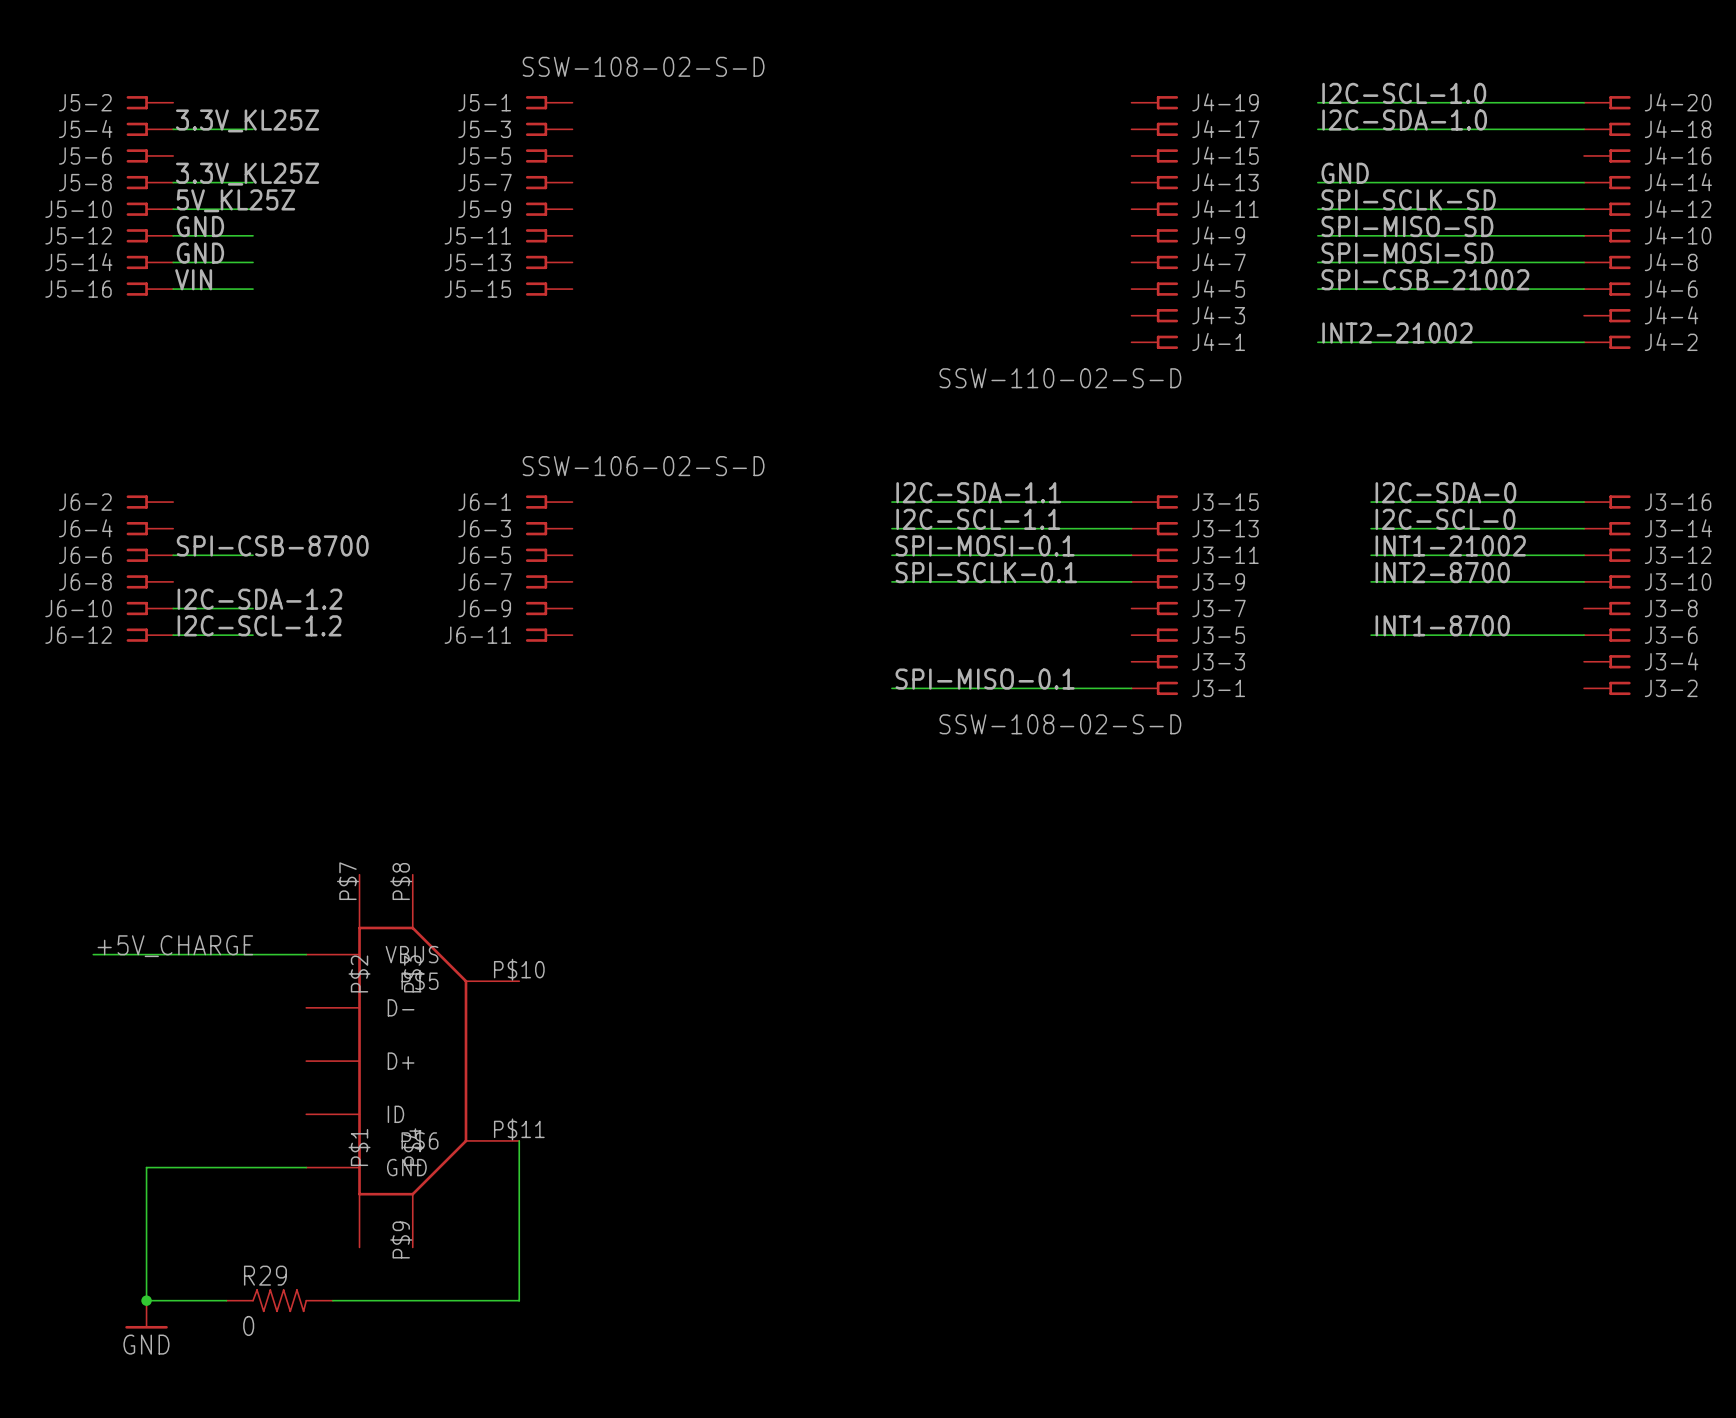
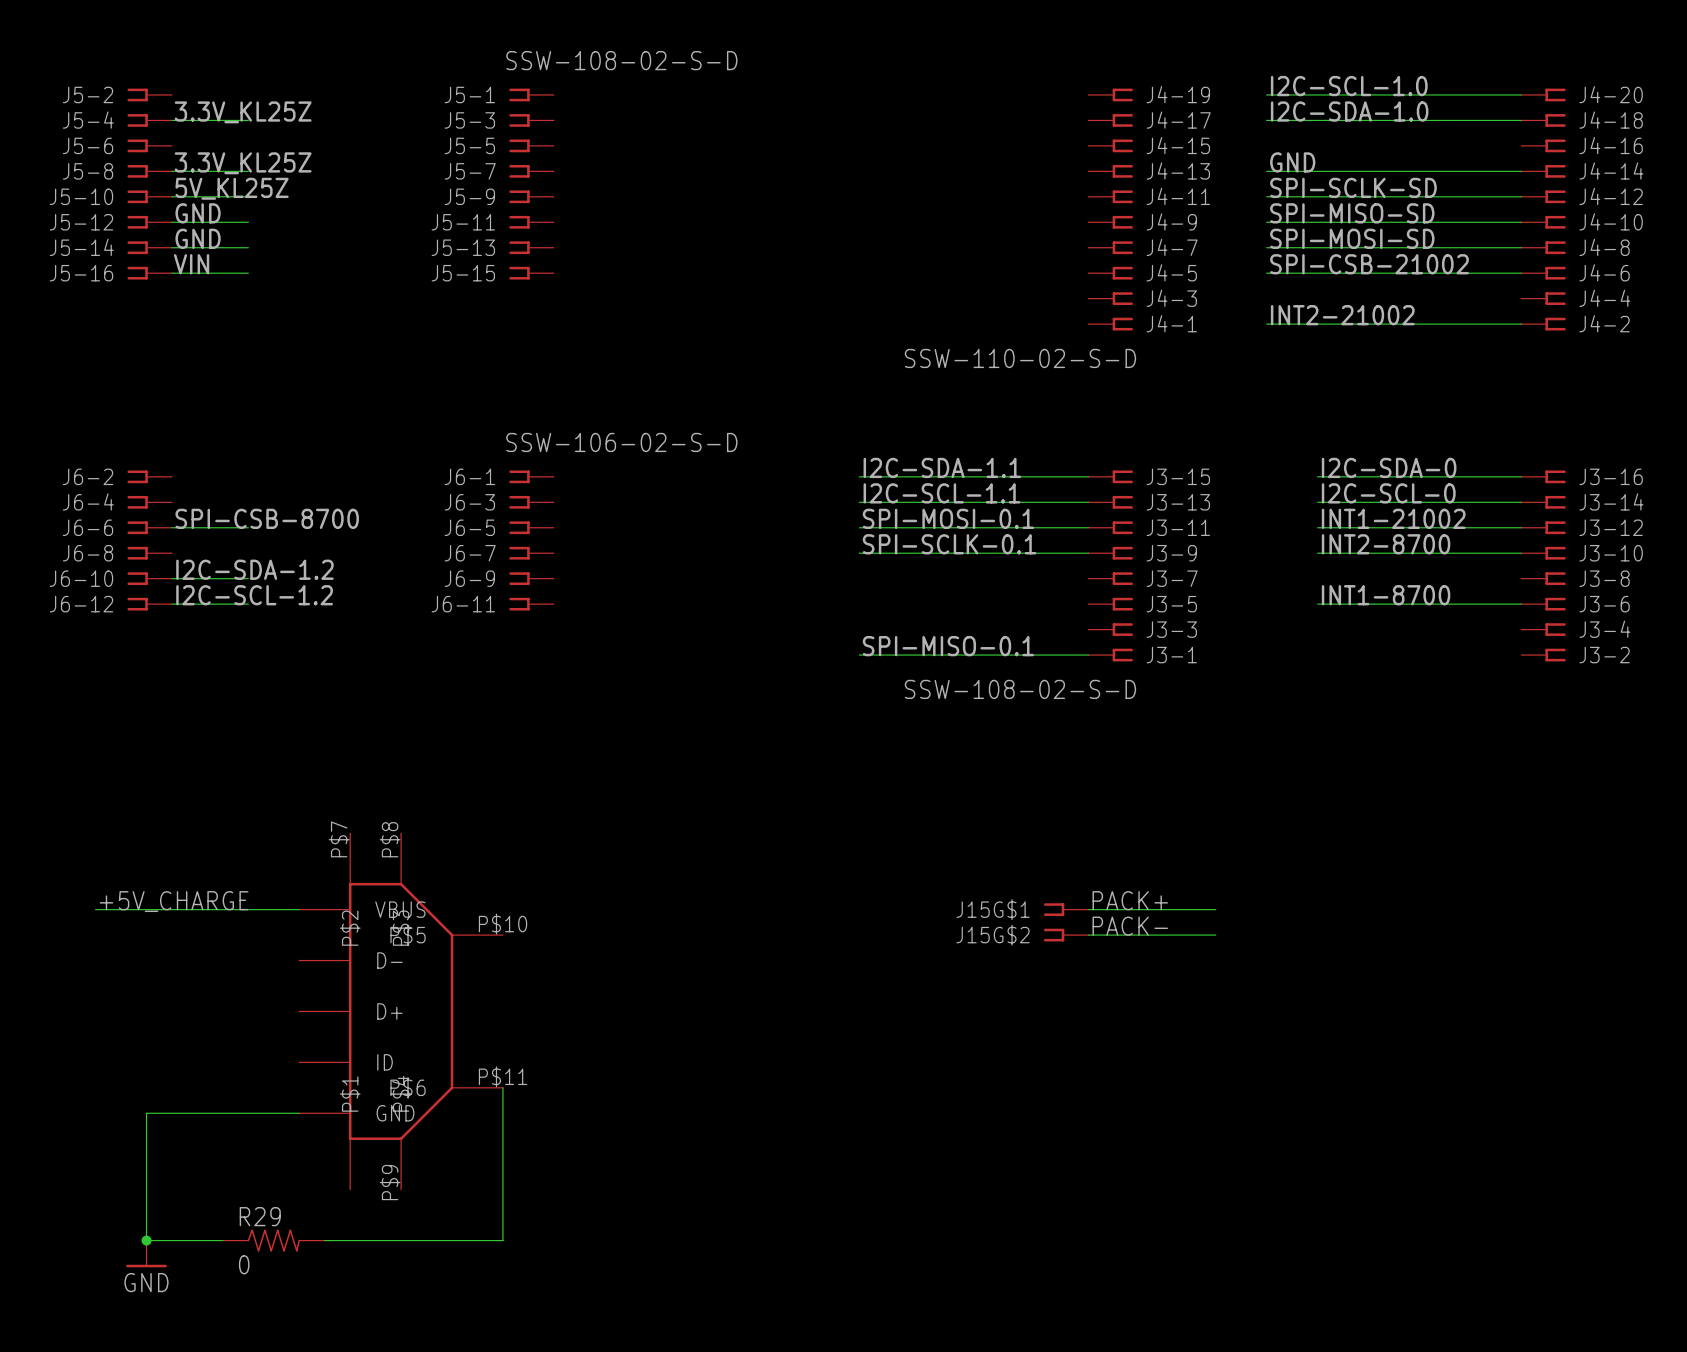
label: none -> PACK+ (1130, 900)
J15G$1: none -> (1066, 909)
wire: none -> (1088, 909) (1215, 909)
label: none -> PACK- (1130, 926)
J15G$2: none -> (1066, 935)
wire: none -> (1088, 935) (1215, 935)

